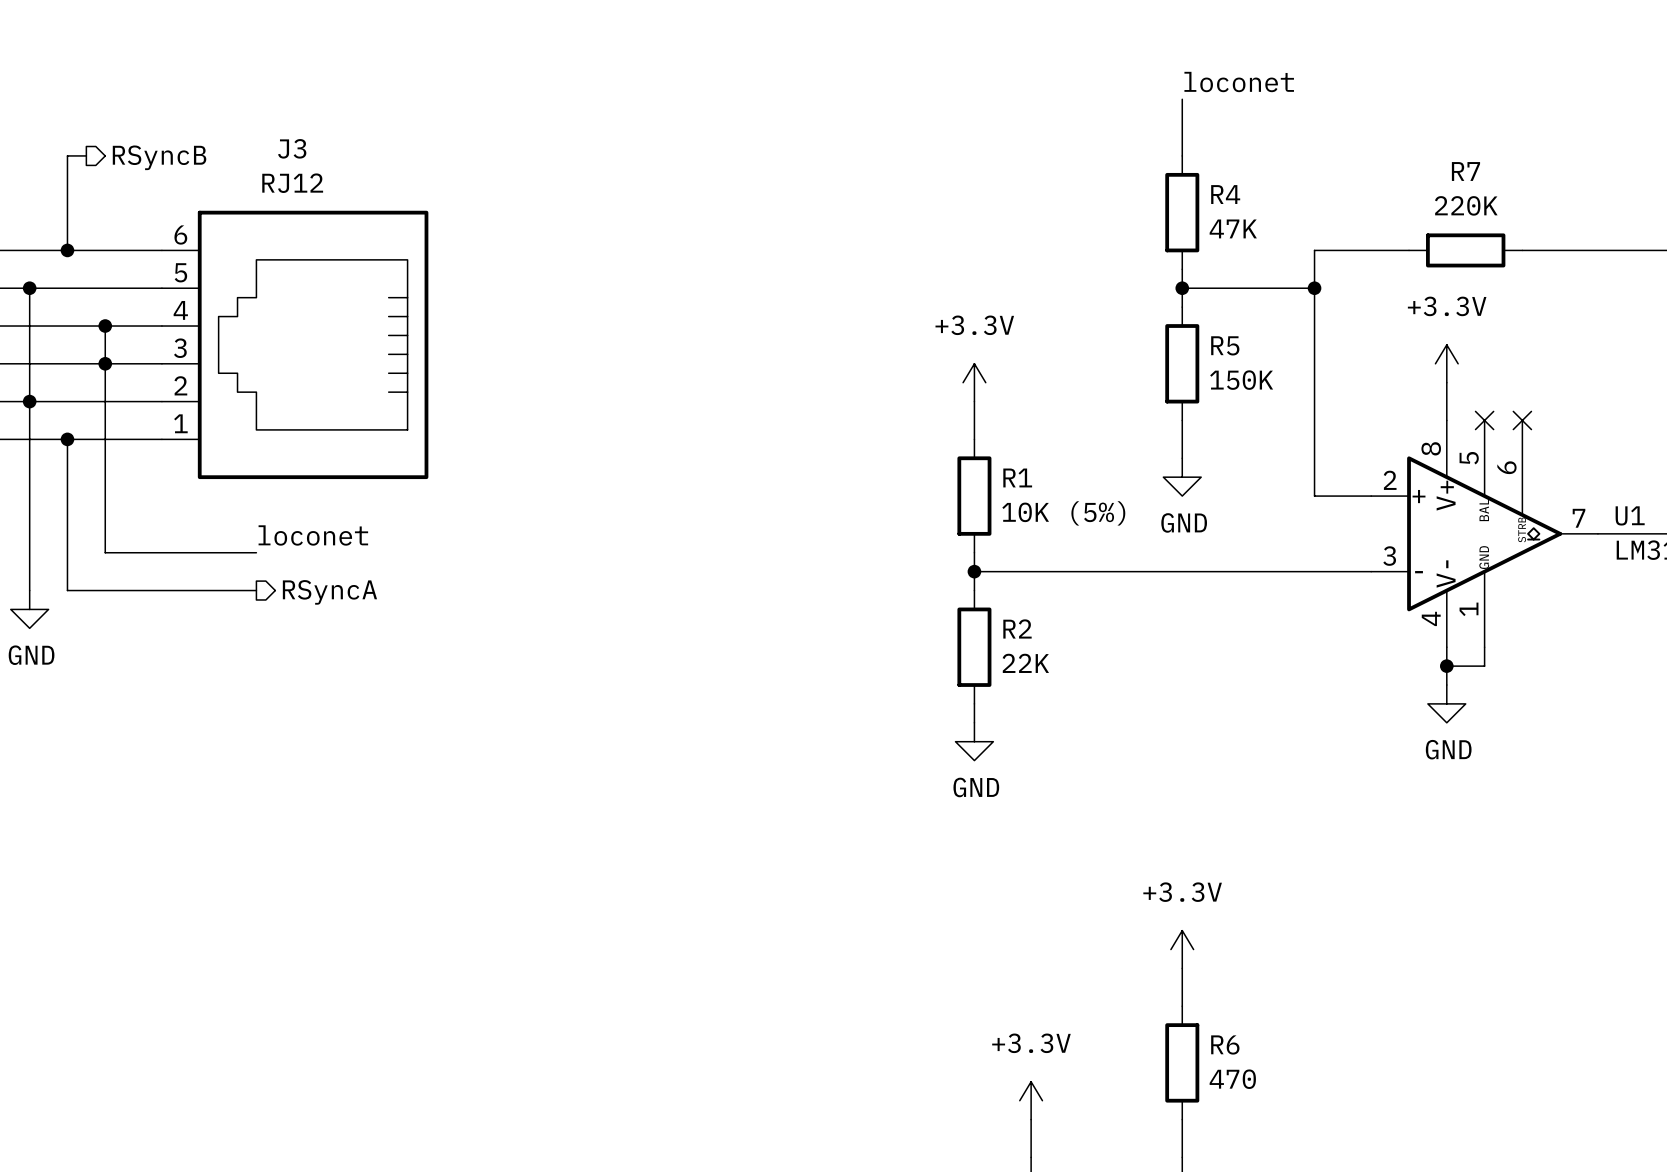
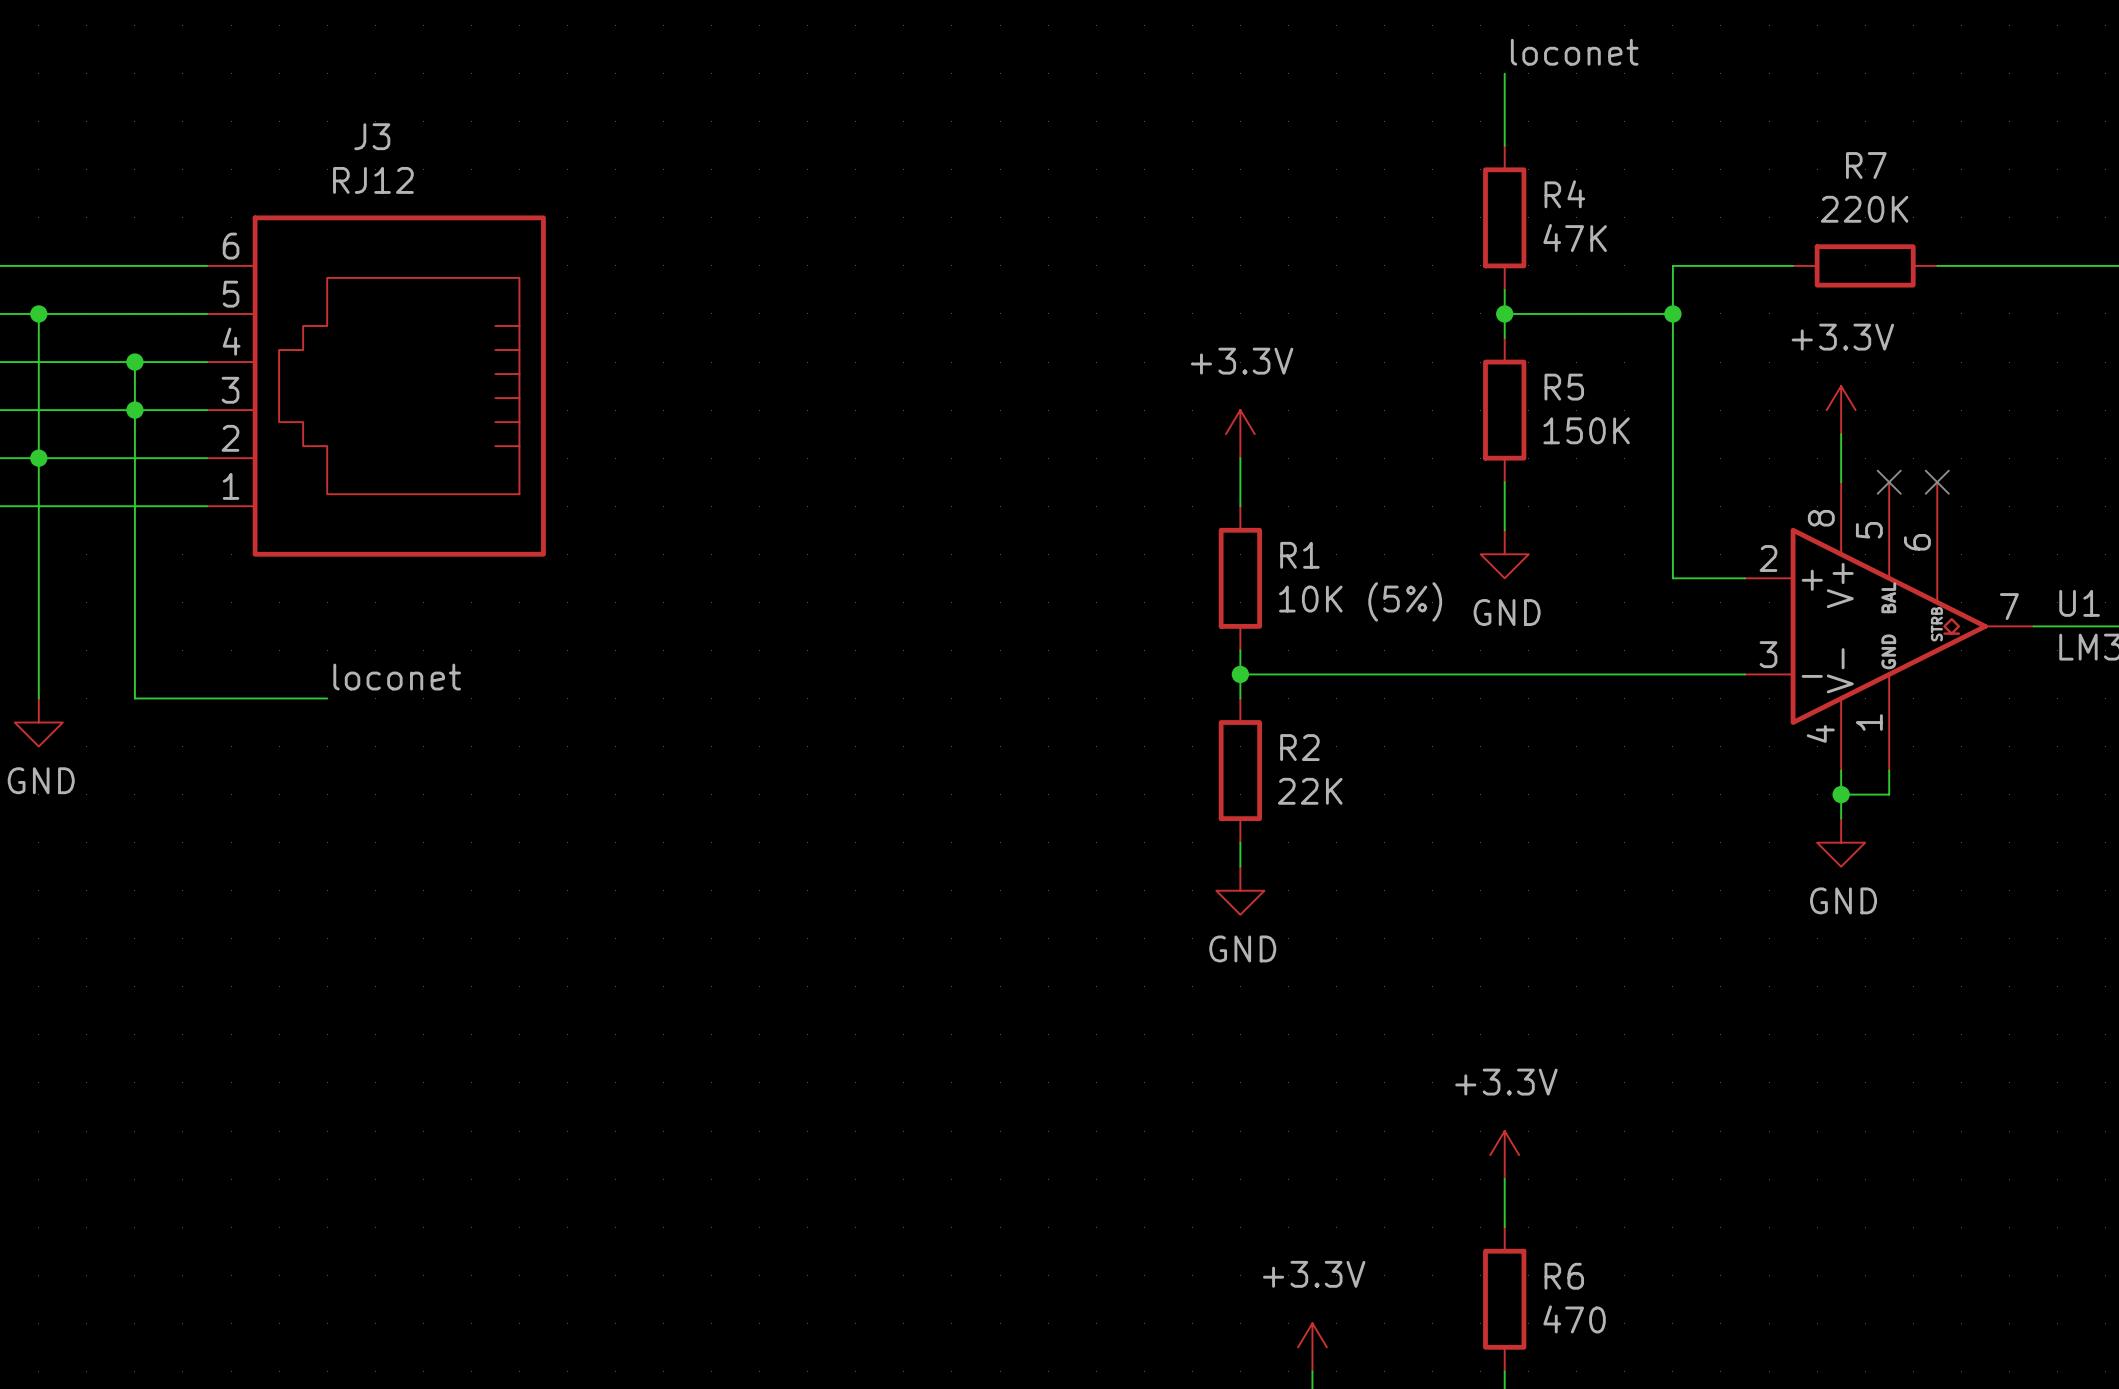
wire: (86, 155) (67, 155) (67, 250) -> none
hierarchical label: RSyncB (159, 157) -> none
junction: (67, 250) -> none
wire: (67, 439) (67, 590) (105, 590) -> (134, 650) (134, 698)
junction: (67, 439) -> none
label position: loconet (313, 535) -> loconet (397, 677)
wire: (105, 552) (256, 552) -> none
hierarchical label: RSyncA (329, 592) -> none

